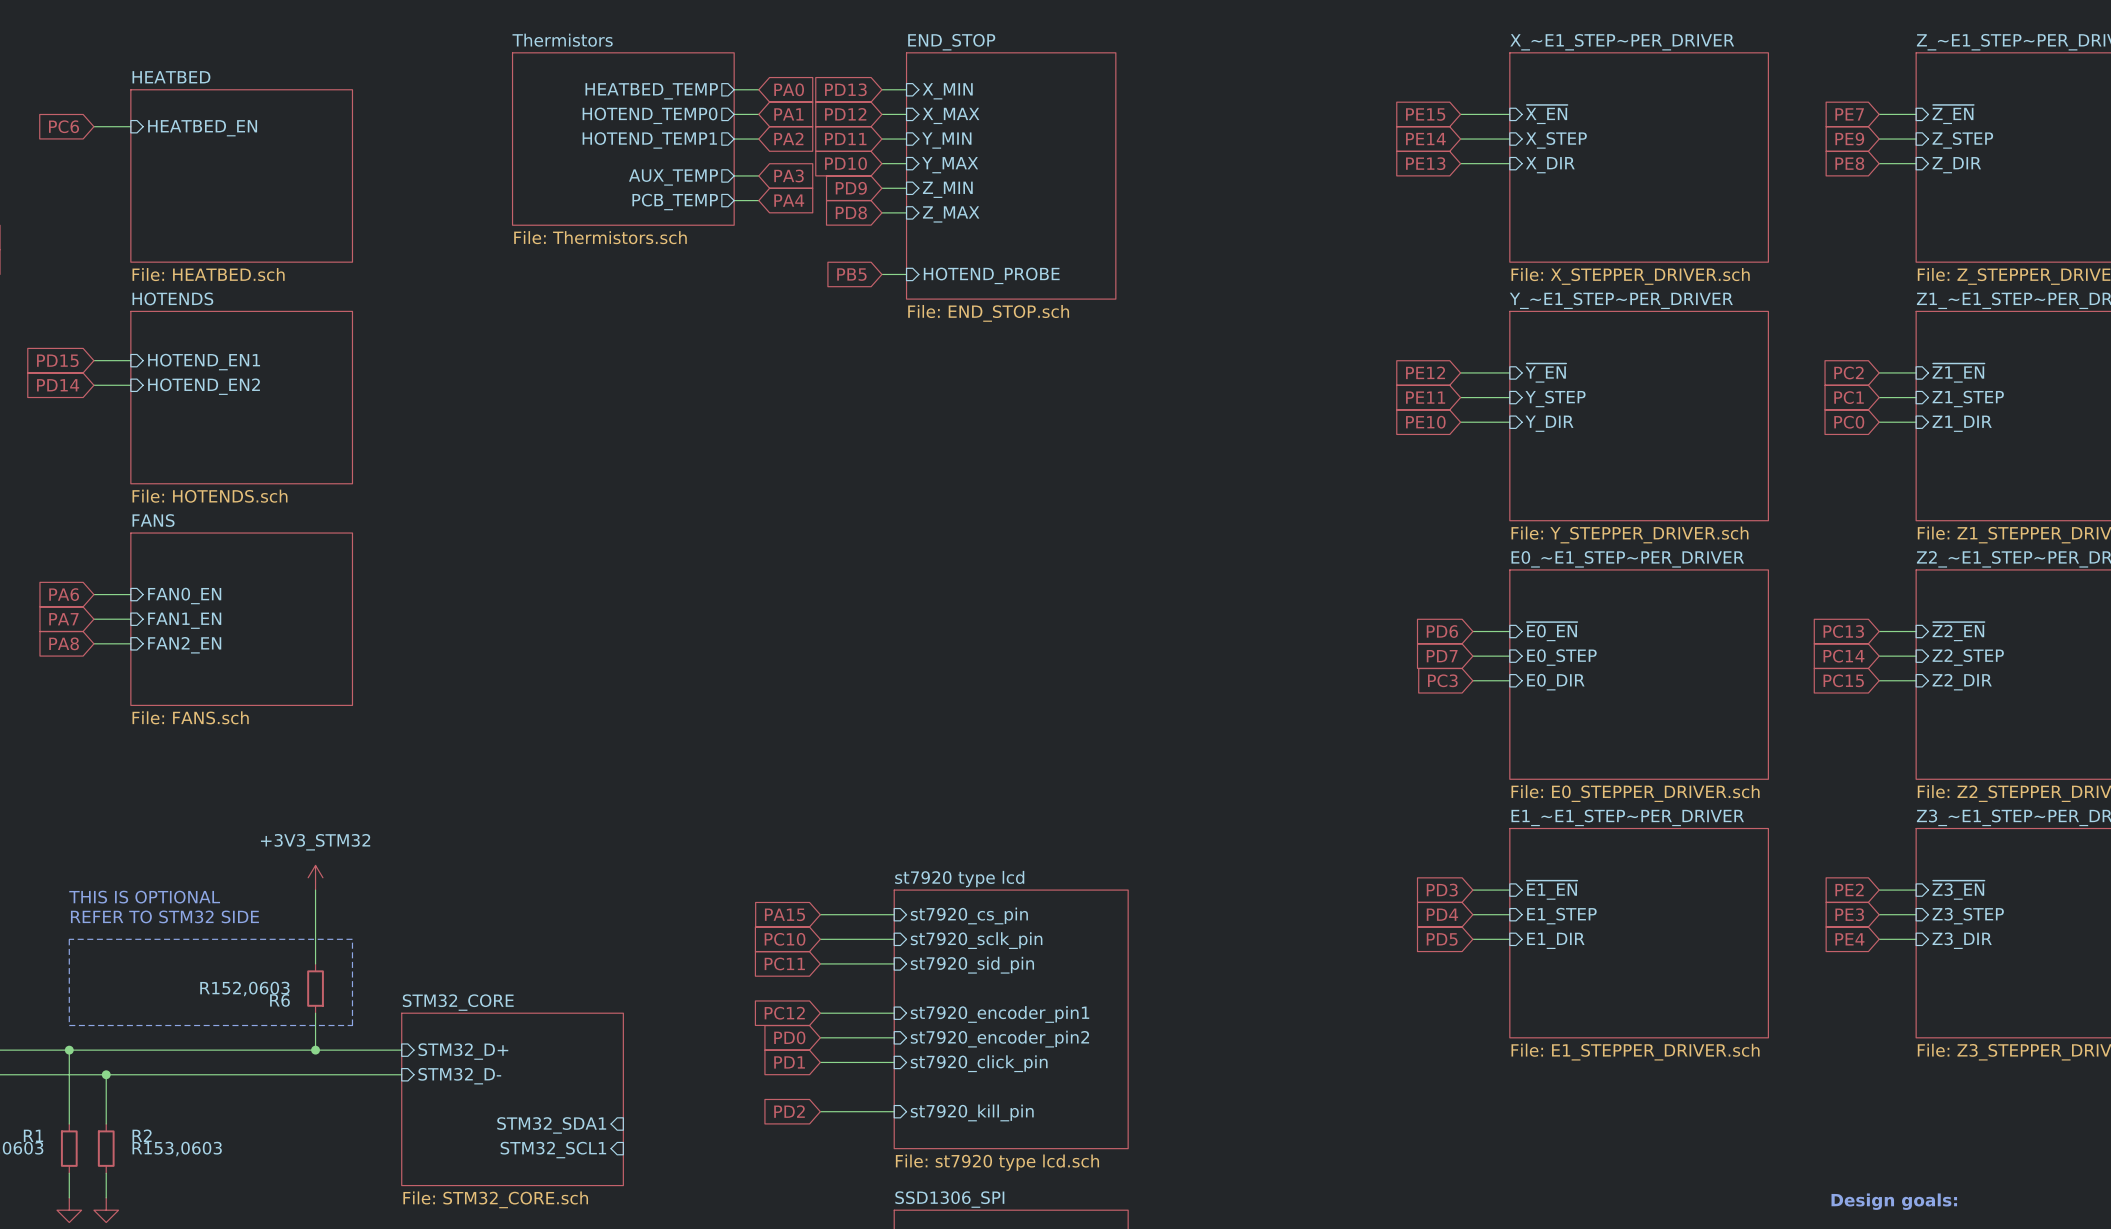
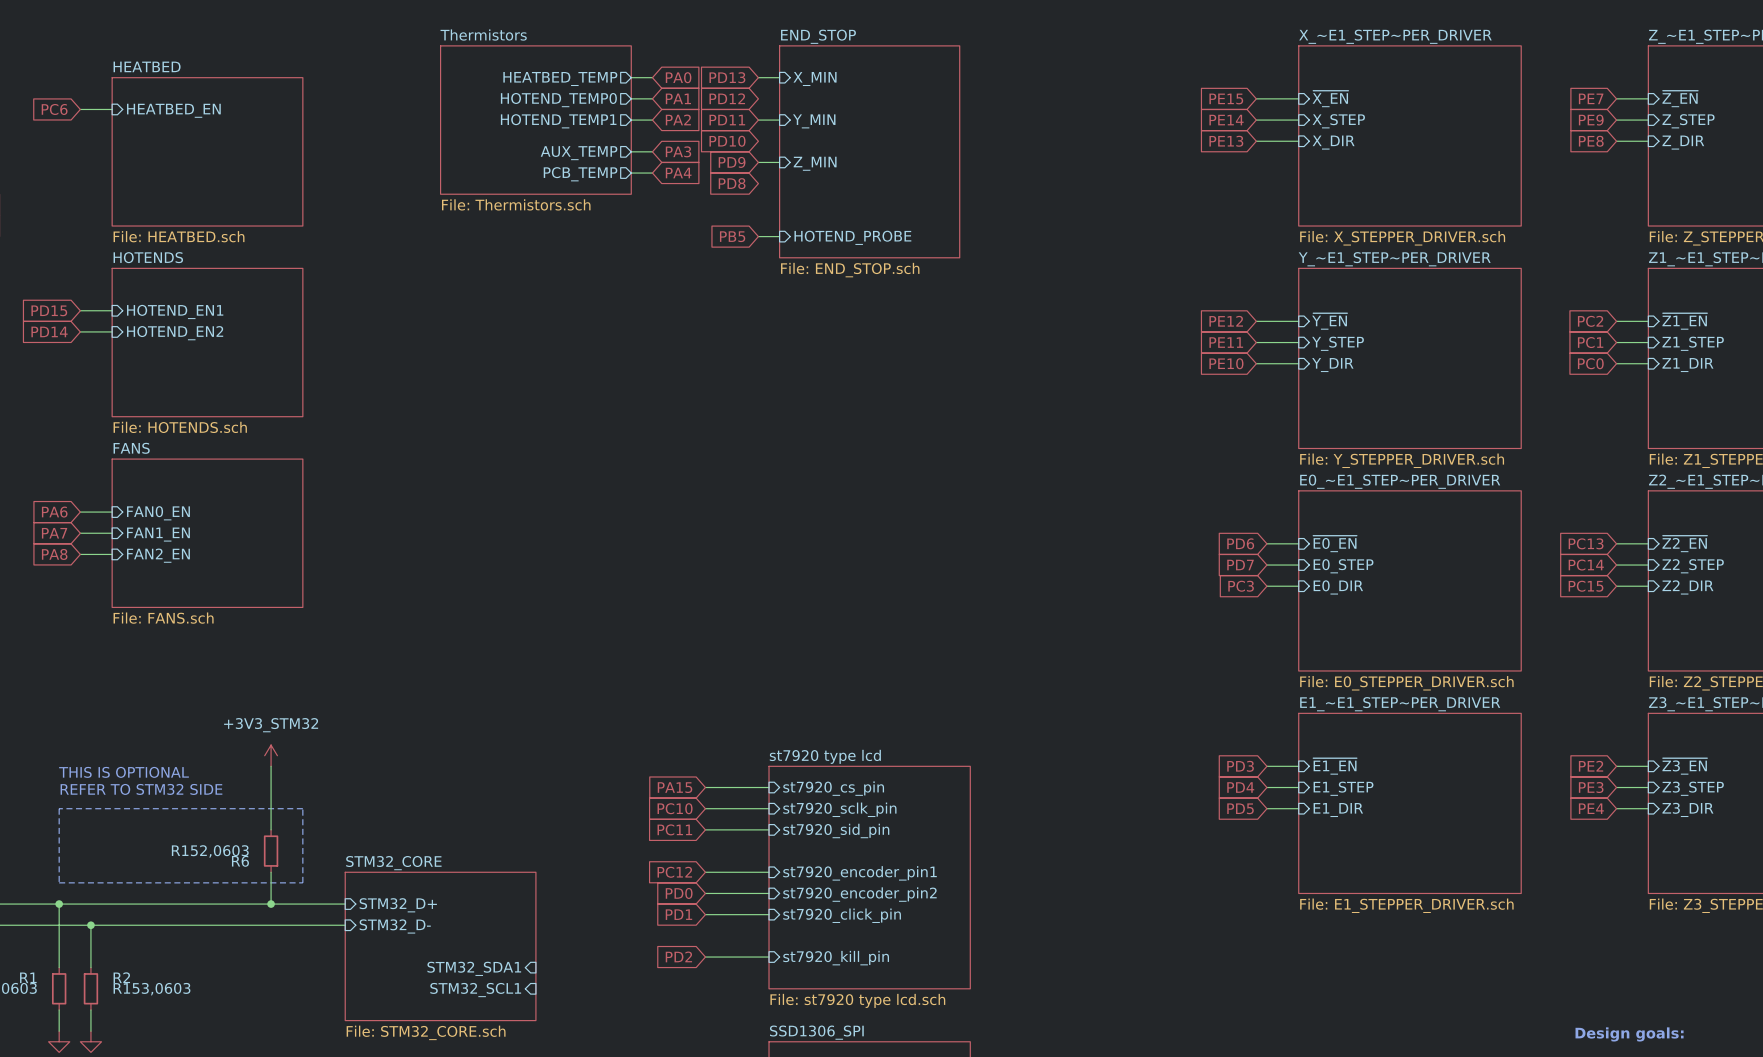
wire: (881, 114) (906, 114) -> none
sheet pin: X_MAX (951, 115) -> none
wire: (881, 163) (906, 163) -> none
sheet pin: Y_MAX (950, 165) -> none
wire: (881, 212) (906, 212) -> none
sheet pin: Z_MAX (951, 214) -> none

